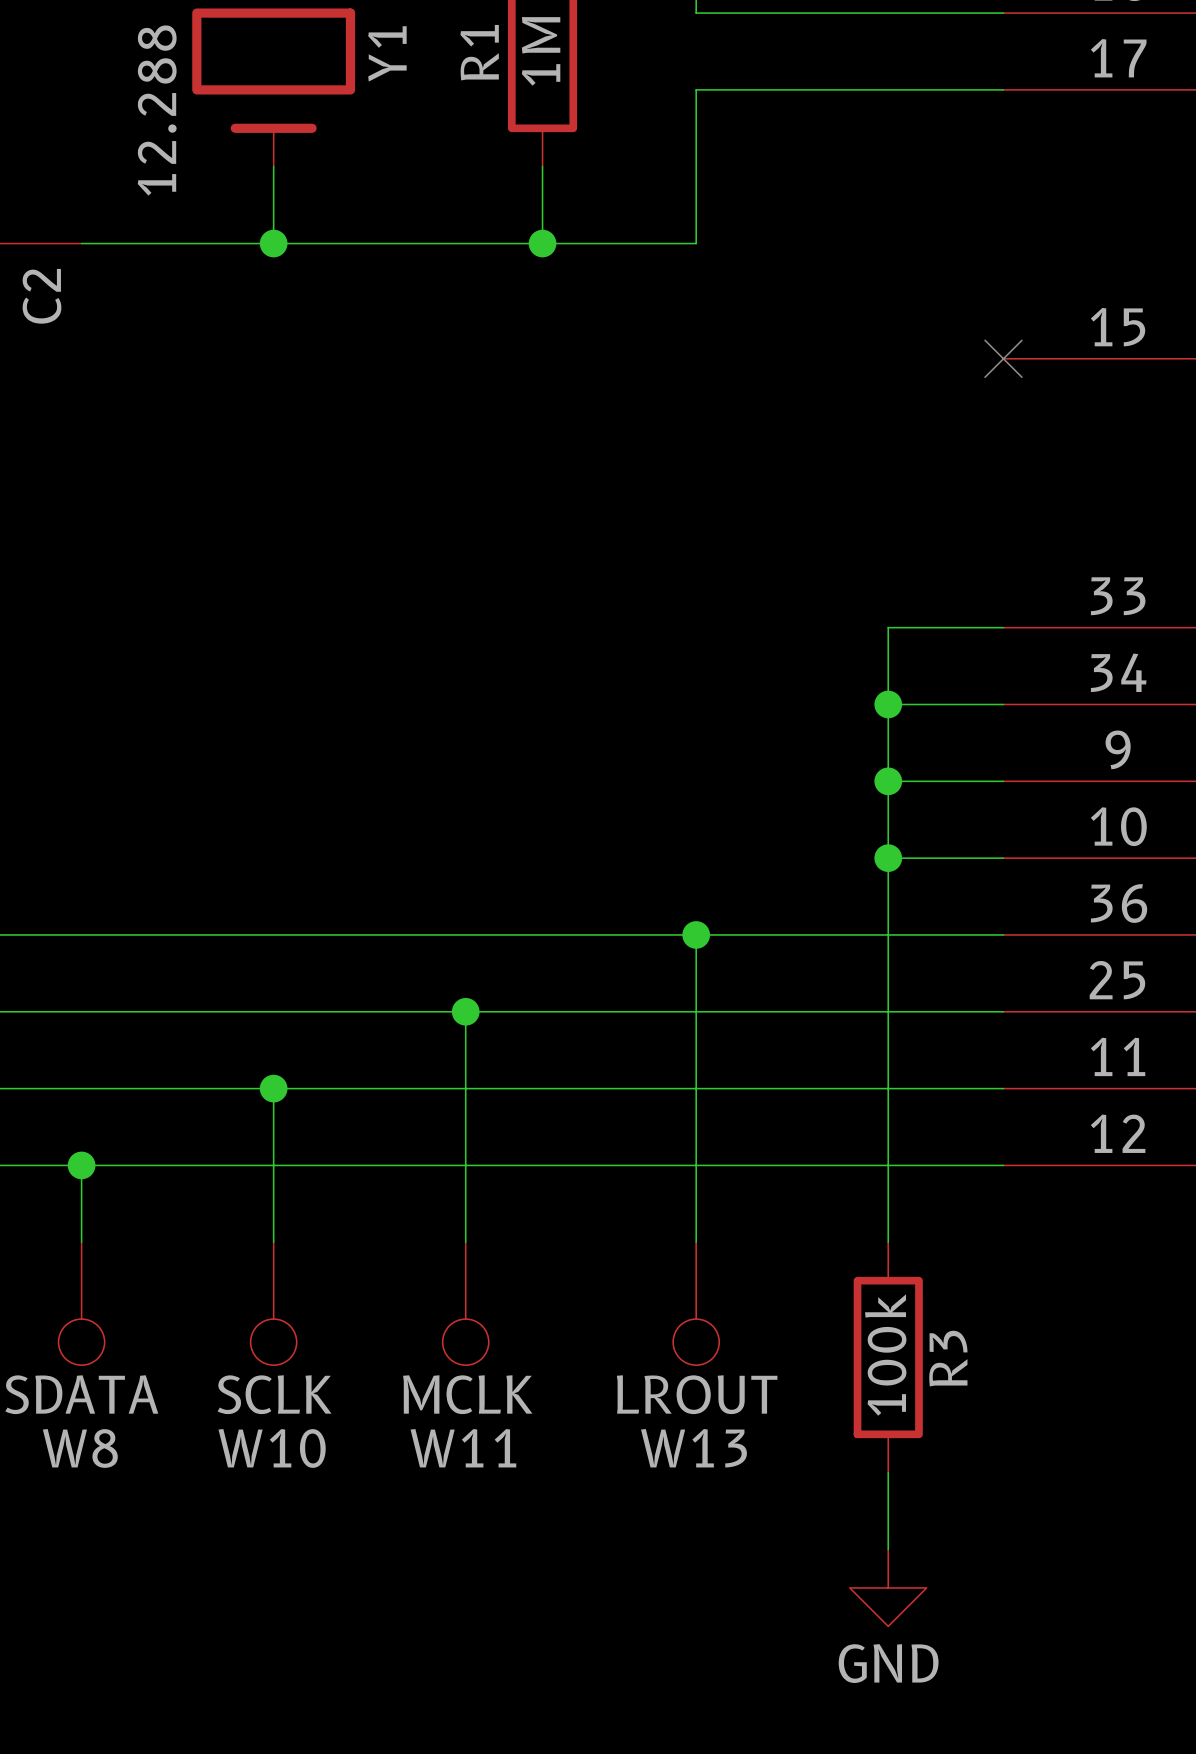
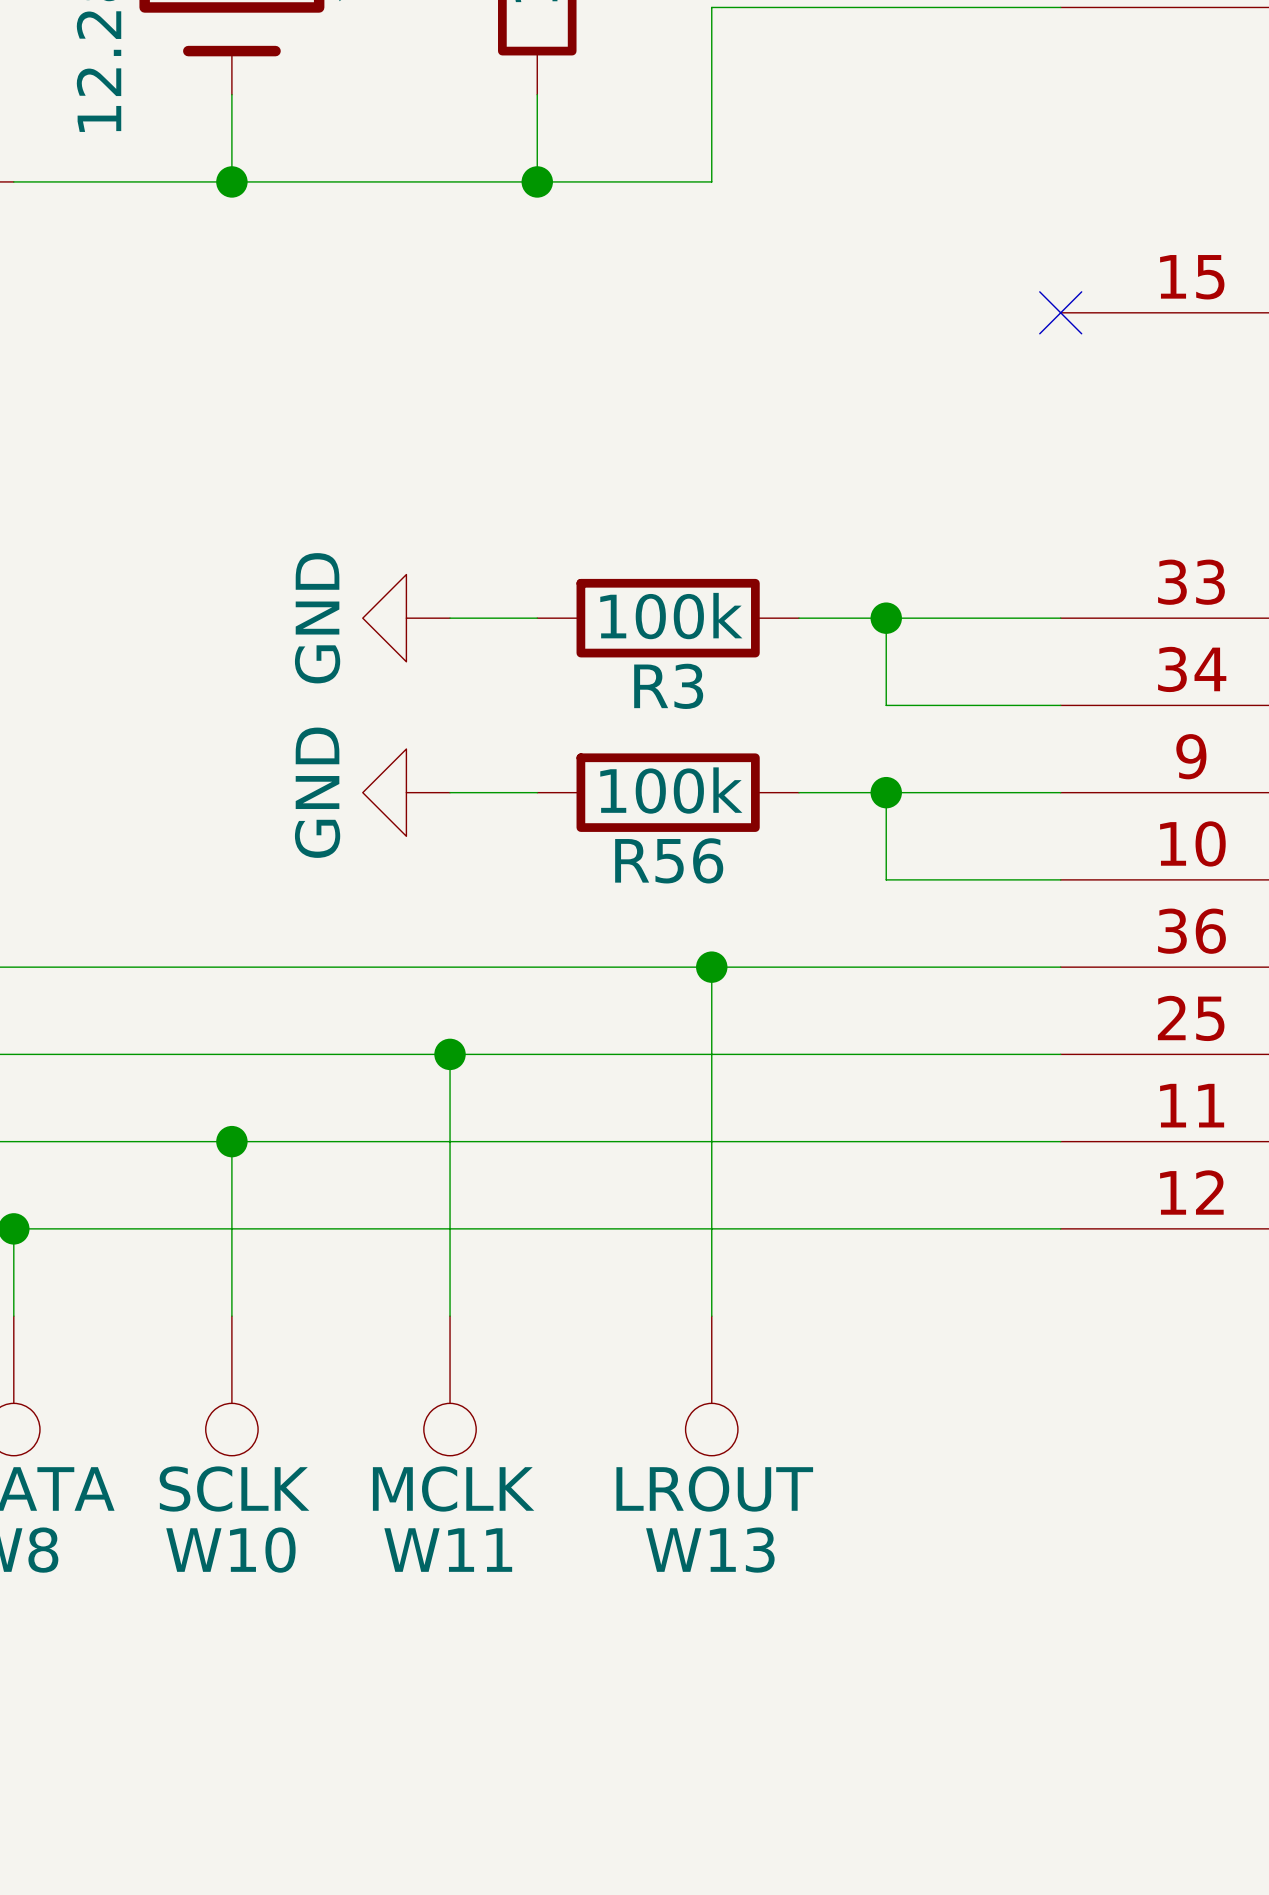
power symbol: none -> GND (406, 618)
wire: none -> (450, 618) (537, 618)
wire: none -> (886, 618) (886, 705) (929, 705)
junction: none -> (886, 618)
wire: (888, 627) (888, 1242) -> (929, 618) (798, 618)
junction: (888, 704) -> none
power symbol: none -> GND (406, 792)
wire: none -> (450, 792) (537, 792)
R56: none -> 100k (668, 792)
wire: none -> (798, 792) (929, 792)
wire: none -> (886, 792) (886, 879) (929, 879)
junction position: (888, 781) -> (886, 792)
junction: (888, 858) -> none
R3 rotation: 0° (888, 1357) -> 90° clockwise (668, 618)
R3 position: (888, 1357) -> (668, 618)
wire: (888, 1472) (888, 1549) -> none
power symbol: GND (888, 1587) -> none

